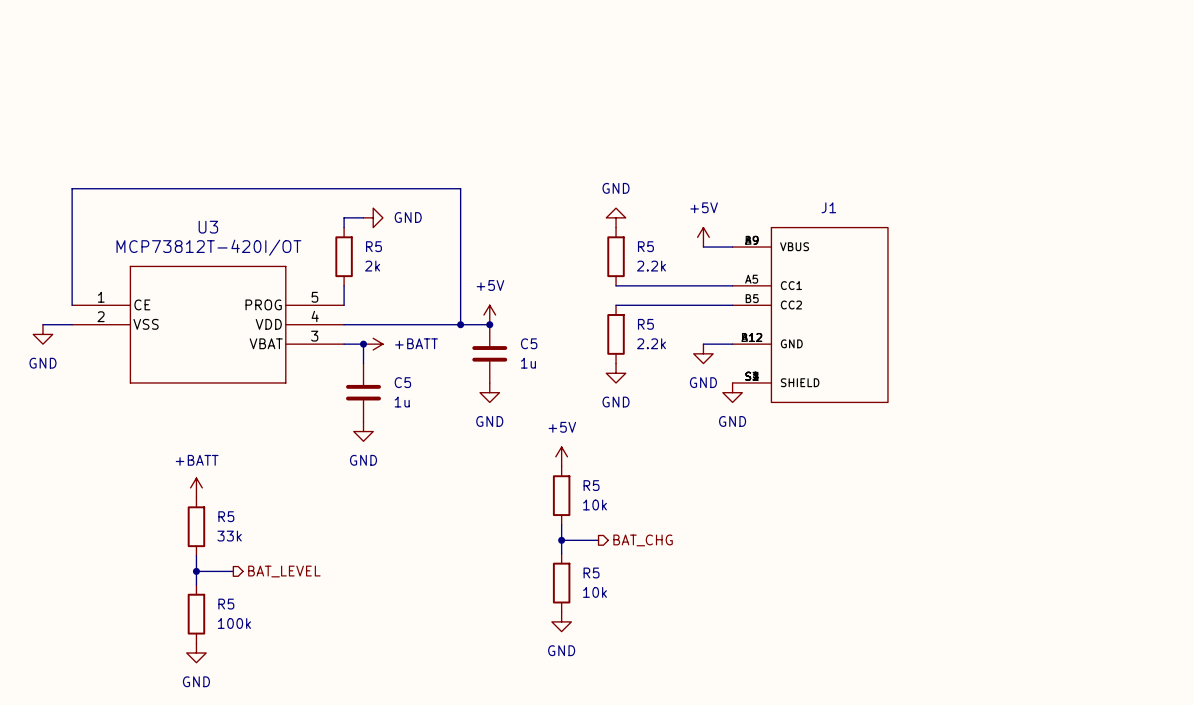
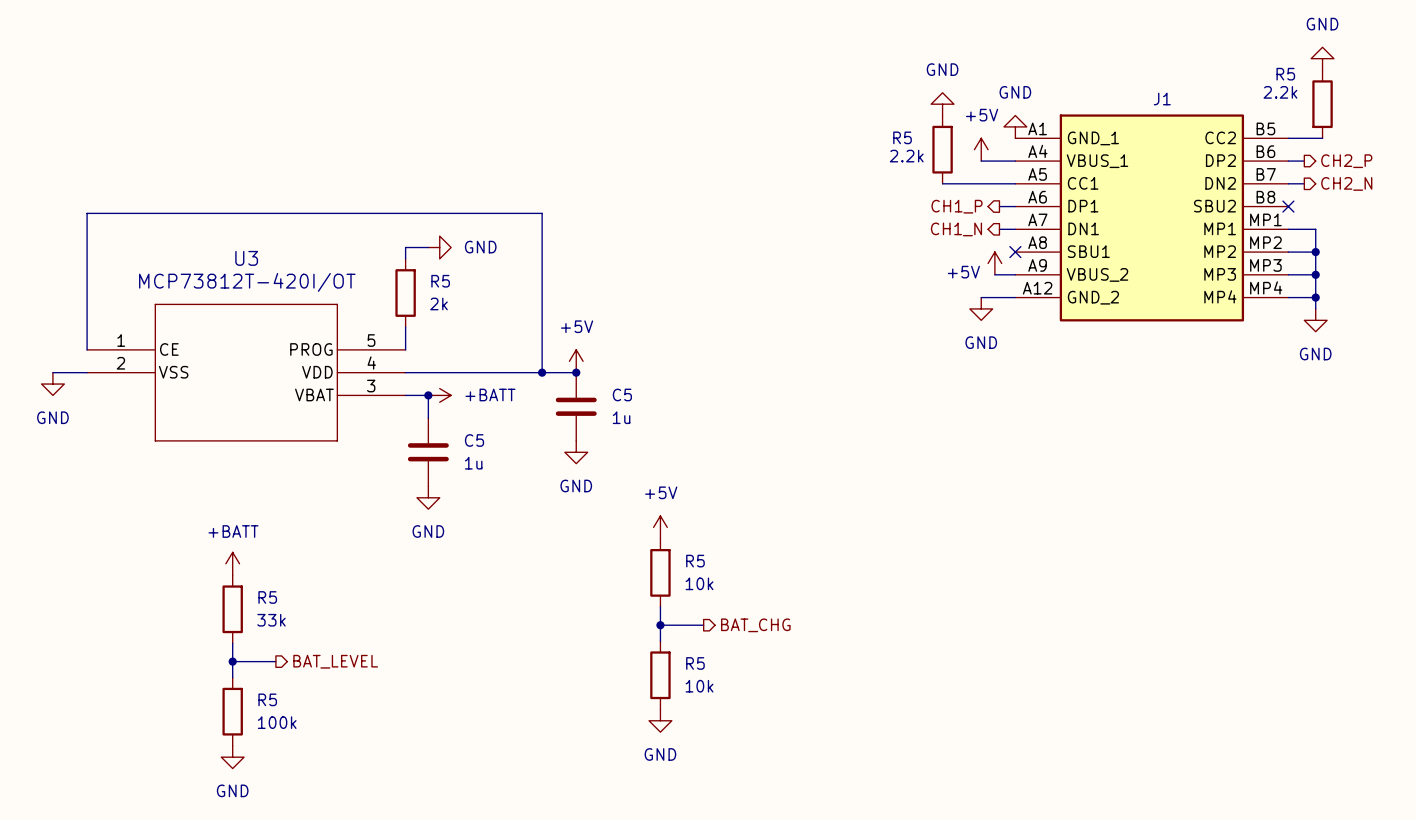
power symbol: none -> GND (1322, 58)
power symbol: none -> GND (942, 104)
R5: none -> 2.2k (1322, 104)
power symbol: none -> GND (1015, 126)
wire: none -> (1288, 138) (1322, 138)
R5: none -> 2.2k (942, 149)
power symbol: none -> +5V (981, 149)
wire: none -> (981, 161) (1015, 161)
wire: none -> (1288, 161) (1304, 161)
hierarchical label: none -> CH2_P (1346, 161)
wire: none -> (942, 183) (1015, 183)
wire: none -> (1288, 183) (1304, 183)
hierarchical label: none -> CH2_N (1346, 183)
wire: none -> (999, 206) (1015, 206)
no-connect mark: none -> (1288, 206)
hierarchical label: none -> CH1_P (957, 206)
hierarchical label: none -> CH1_N (956, 229)
wire: none -> (999, 229) (1015, 229)
wire: none -> (1288, 229) (1315, 229) (1315, 308)
power symbol: GND (616, 217) -> none
no-connect mark: none -> (1015, 252)
wire: none -> (1288, 252) (1315, 252)
junction: none -> (1315, 252)
J1 symbol: [732, 227, 889, 403] -> [1015, 114, 1289, 322]
power symbol: none -> +5V (994, 263)
power symbol: +5V (703, 237) -> none
wire: none -> (994, 274) (1015, 274)
wire: none -> (1288, 274) (1315, 274)
junction: none -> (1315, 274)
wire: (703, 247) (732, 247) -> (981, 297) (1015, 297)
R5: 2.2k (616, 256) -> none
wire: none -> (1288, 297) (1315, 297)
junction: none -> (1315, 297)
power symbol: none -> GND (981, 308)
power symbol: none -> GND (1315, 320)
wire: (616, 285) (732, 285) -> none
wire: (616, 305) (732, 305) -> none
R5: 2.2k (616, 334) -> none
wire: (703, 344) (732, 344) -> none
power symbol: GND (703, 353) -> none
power symbol: GND (616, 373) -> none
power symbol: GND (732, 392) -> none

